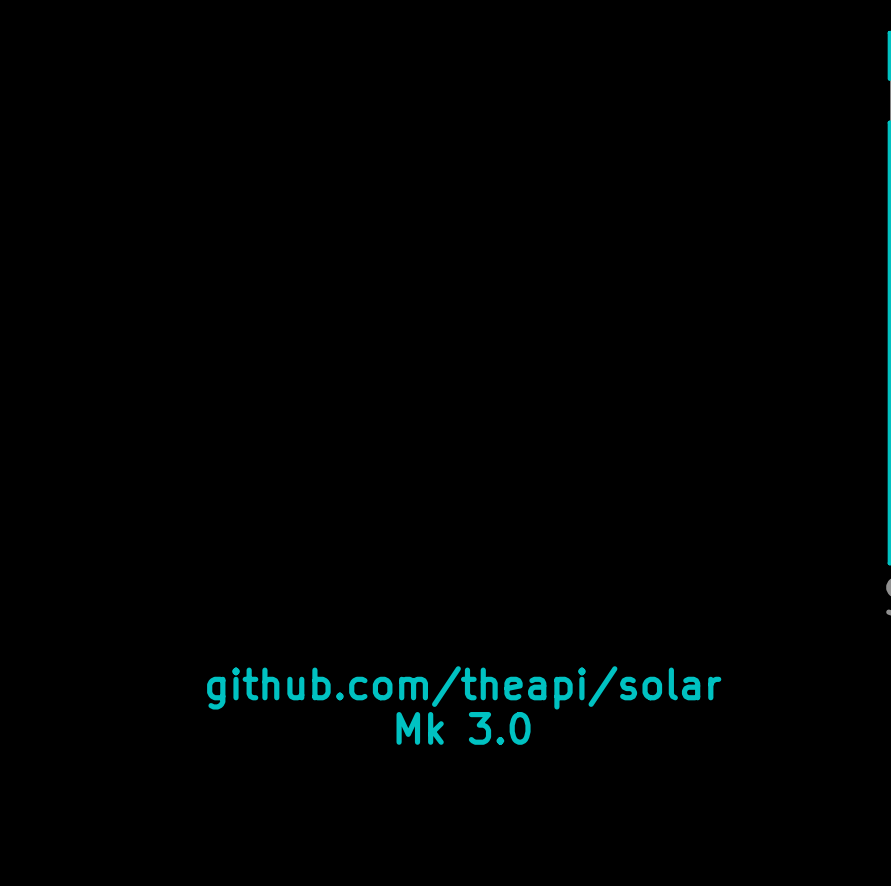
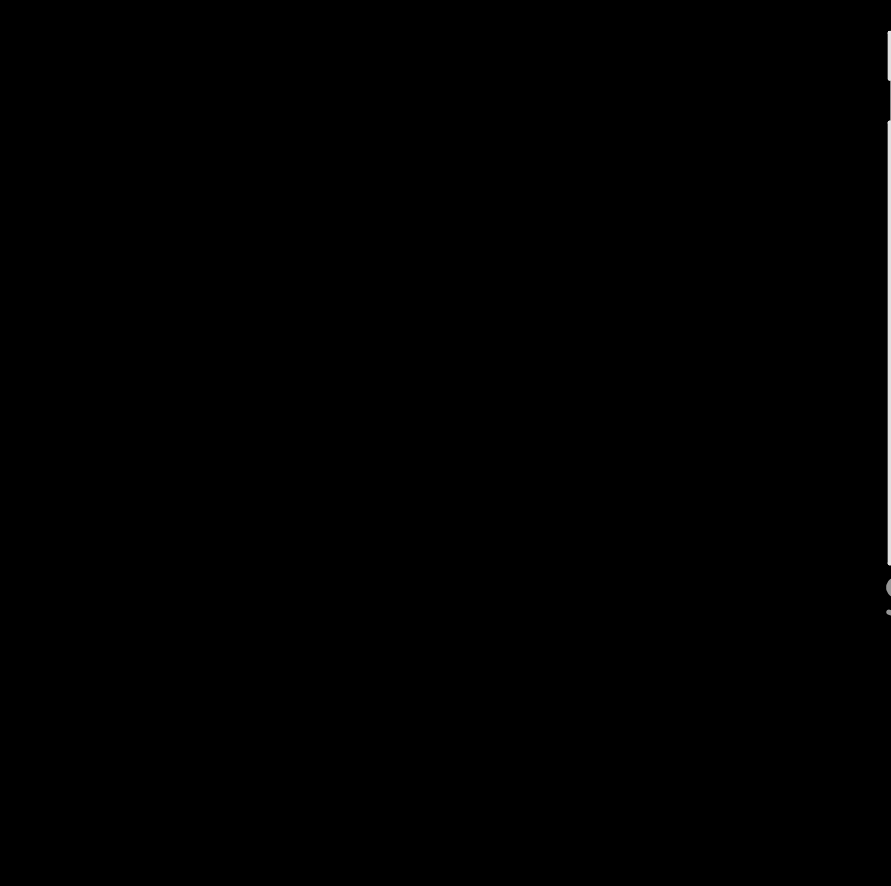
text: github.com/theapi/solar (464, 687) -> none
text: Mk 3.0 (463, 728) -> none

